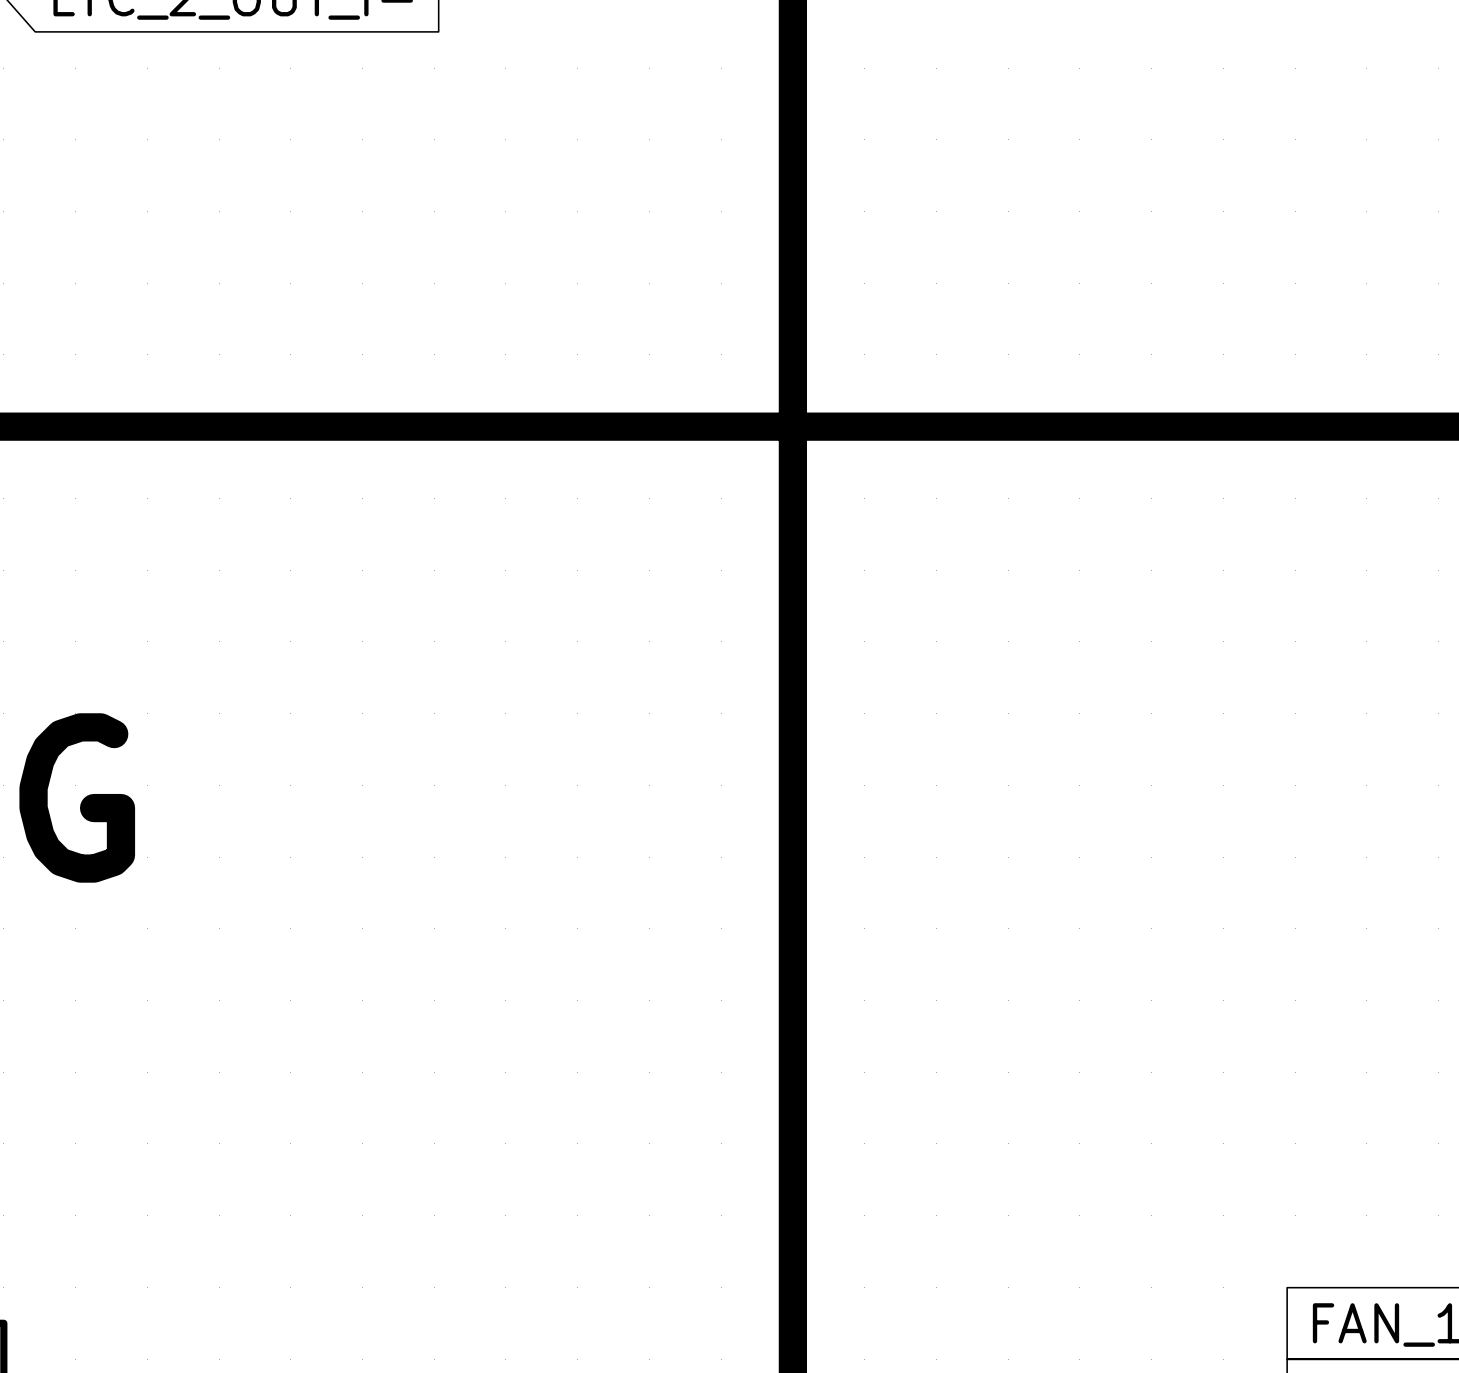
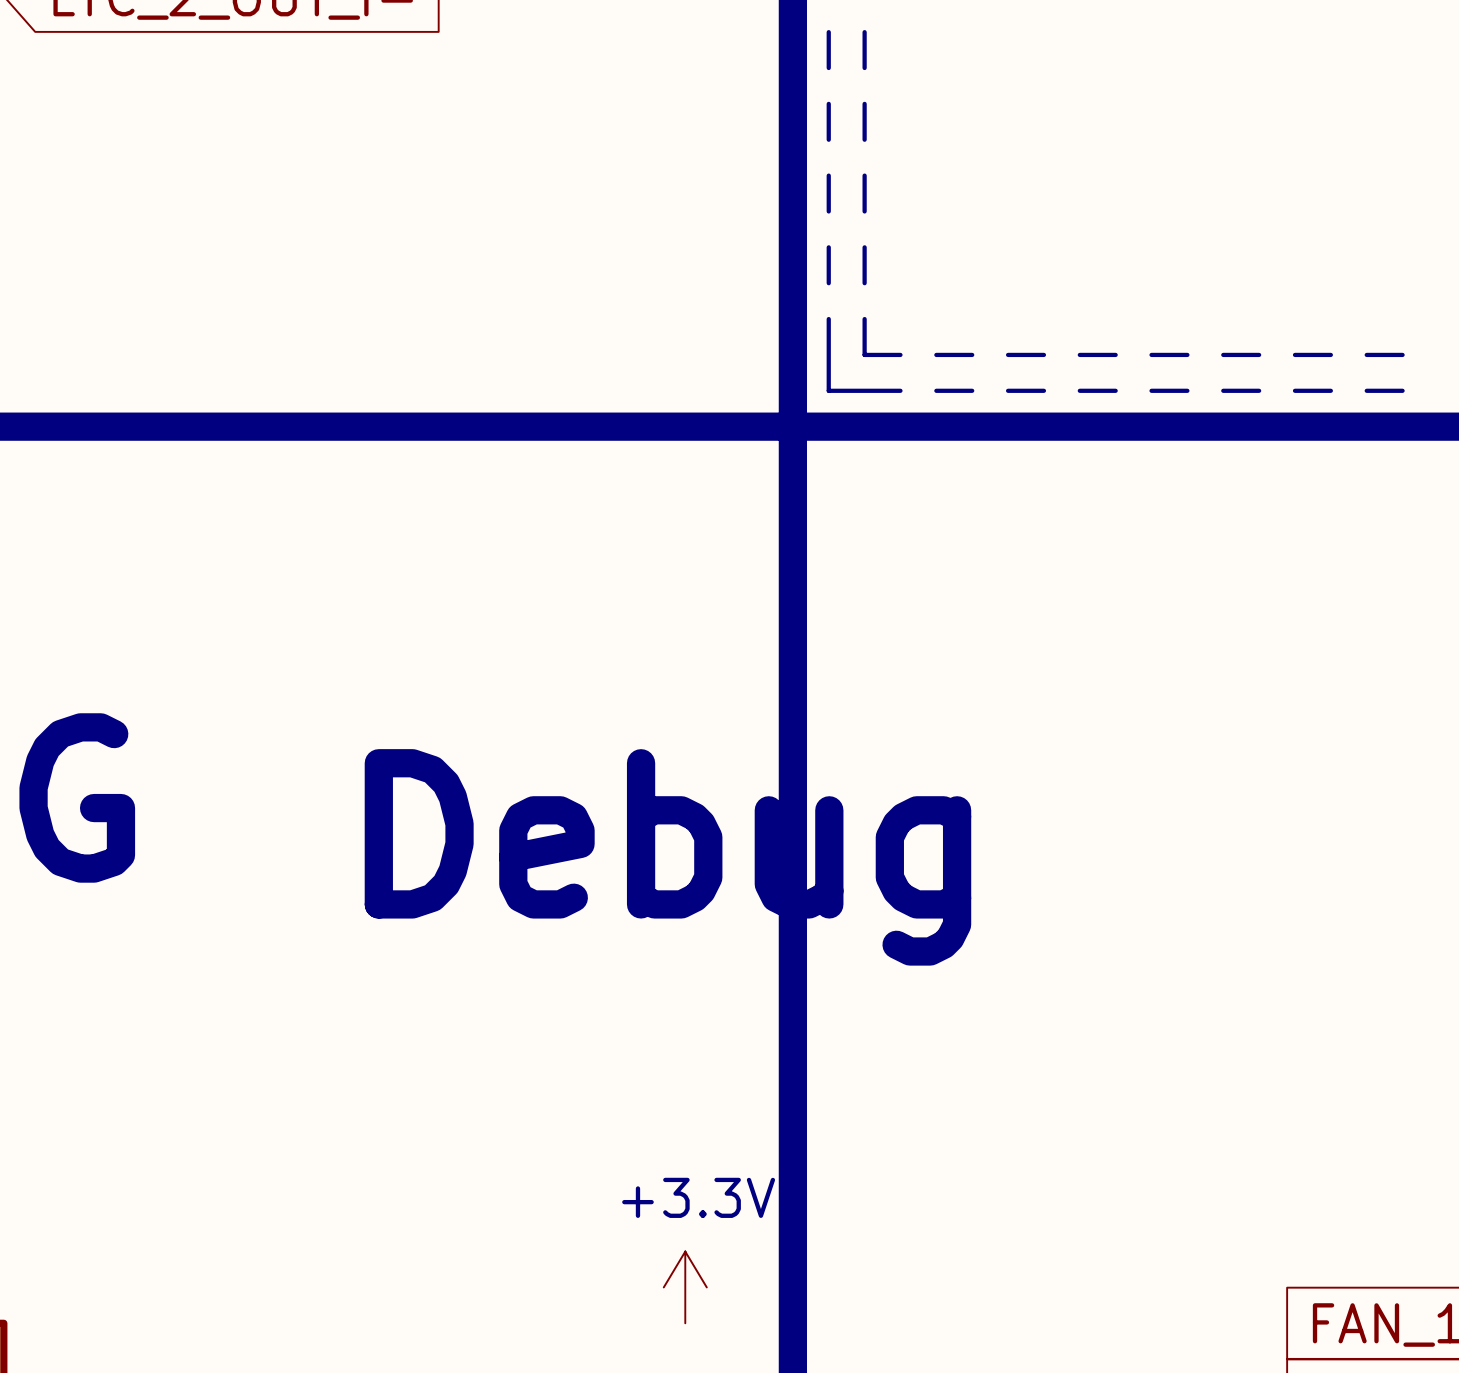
line: none -> (828, 32) (828, 68)
line: none -> (864, 32) (864, 68)
line: none -> (828, 103) (828, 139)
line: none -> (864, 103) (864, 139)
line: none -> (828, 175) (828, 211)
line: none -> (864, 175) (864, 211)
line: none -> (828, 247) (828, 283)
line: none -> (864, 247) (864, 283)
line: none -> (828, 319) (828, 390) (900, 390)
line: none -> (864, 319) (864, 354) (900, 354)
line: none -> (936, 354) (972, 354)
line: none -> (1008, 354) (1043, 354)
line: none -> (1079, 354) (1115, 354)
line: none -> (1151, 354) (1187, 354)
line: none -> (1223, 354) (1259, 354)
line: none -> (1295, 354) (1330, 354)
line: none -> (1366, 354) (1402, 354)
line: none -> (936, 390) (972, 390)
line: none -> (1008, 390) (1043, 390)
line: none -> (1079, 390) (1115, 390)
line: none -> (1151, 390) (1187, 390)
line: none -> (1223, 390) (1259, 390)
line: none -> (1295, 390) (1330, 390)
line: none -> (1366, 390) (1402, 390)
text: none -> Debug (667, 857)
power symbol: none -> +3.3V (685, 1287)

